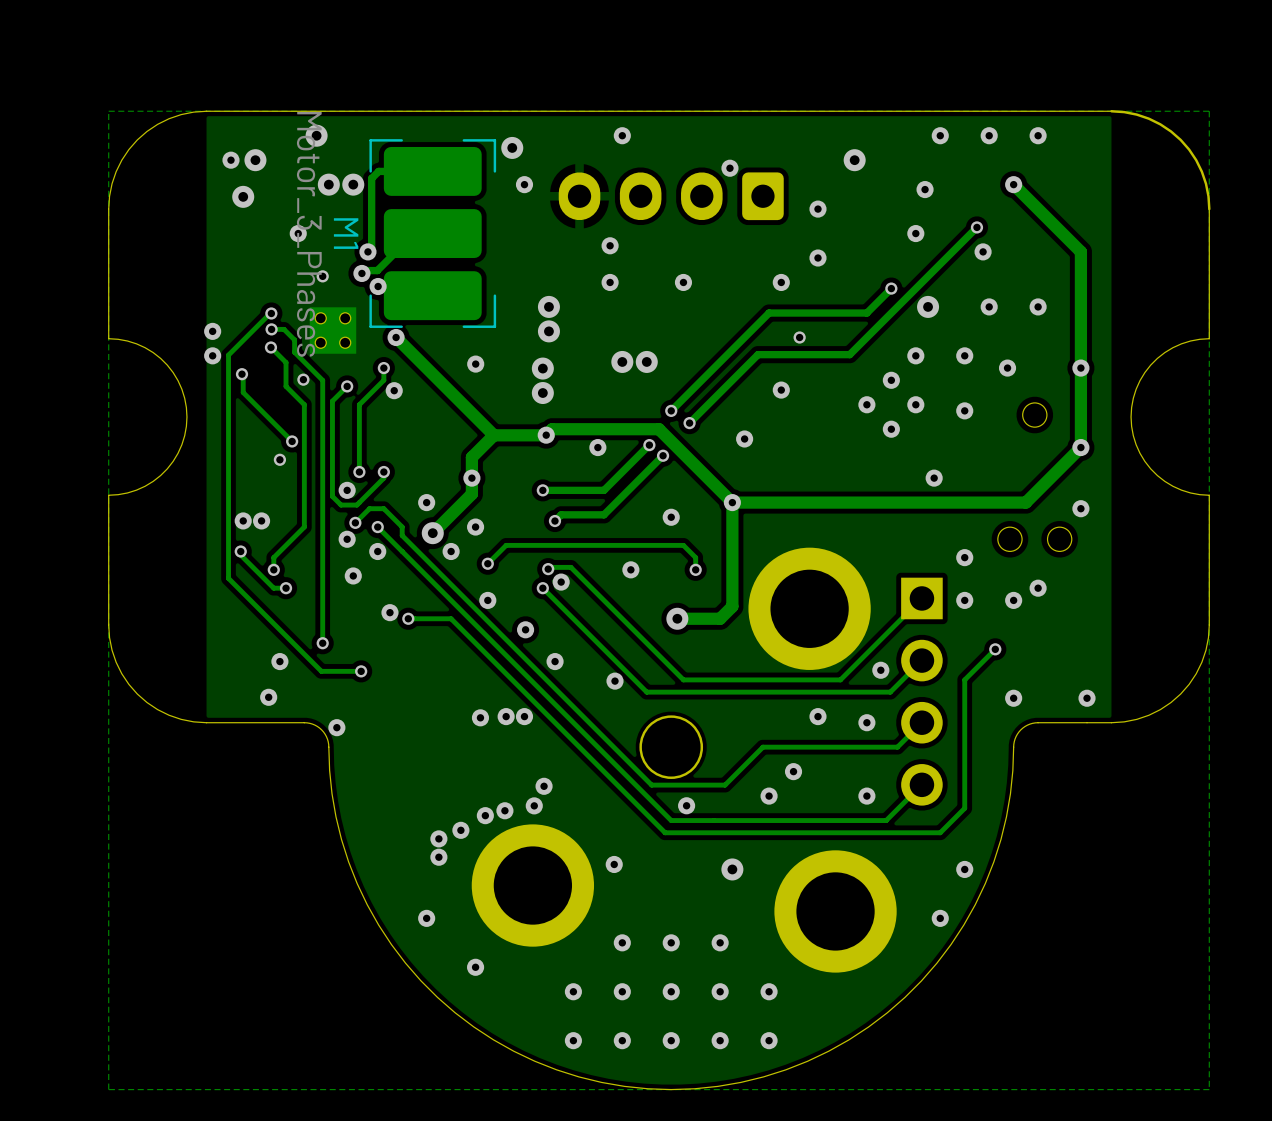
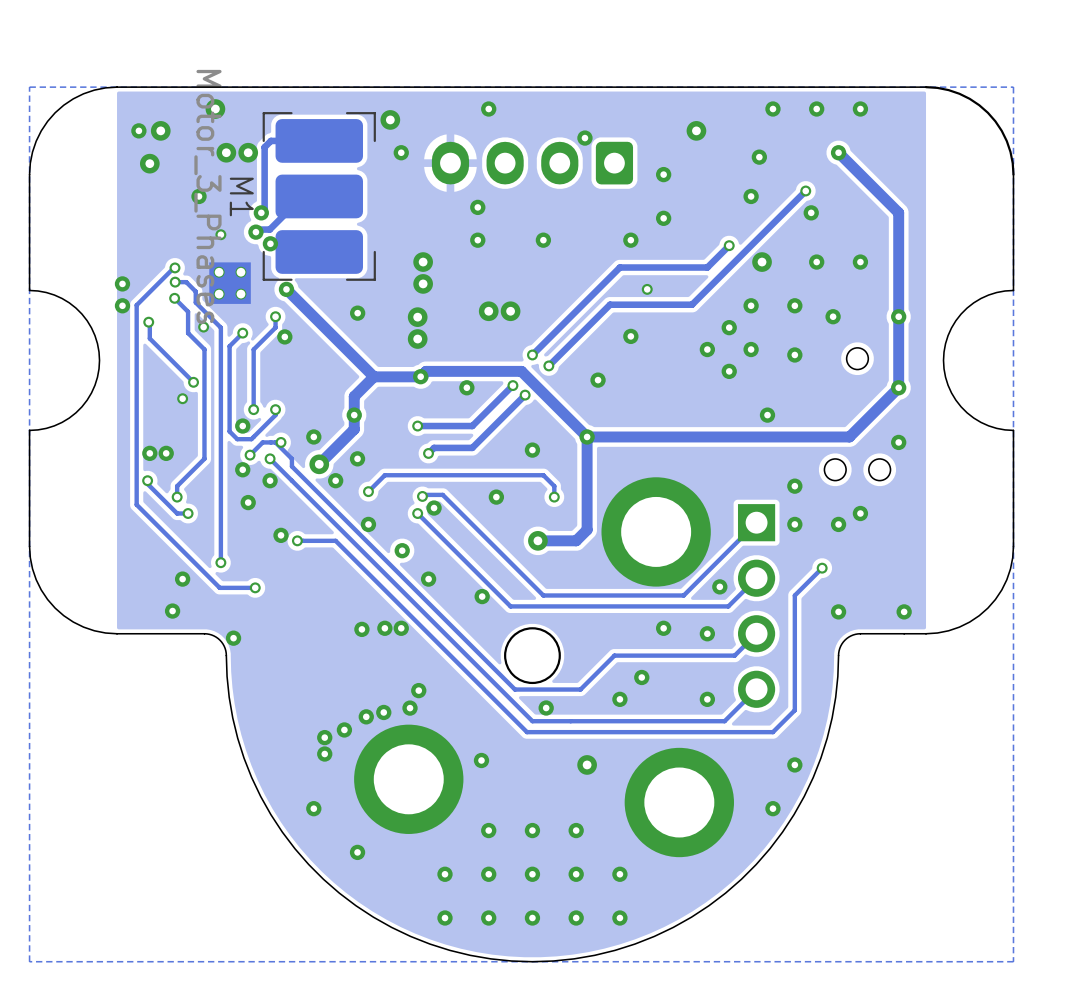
via: none -> (281, 442)

